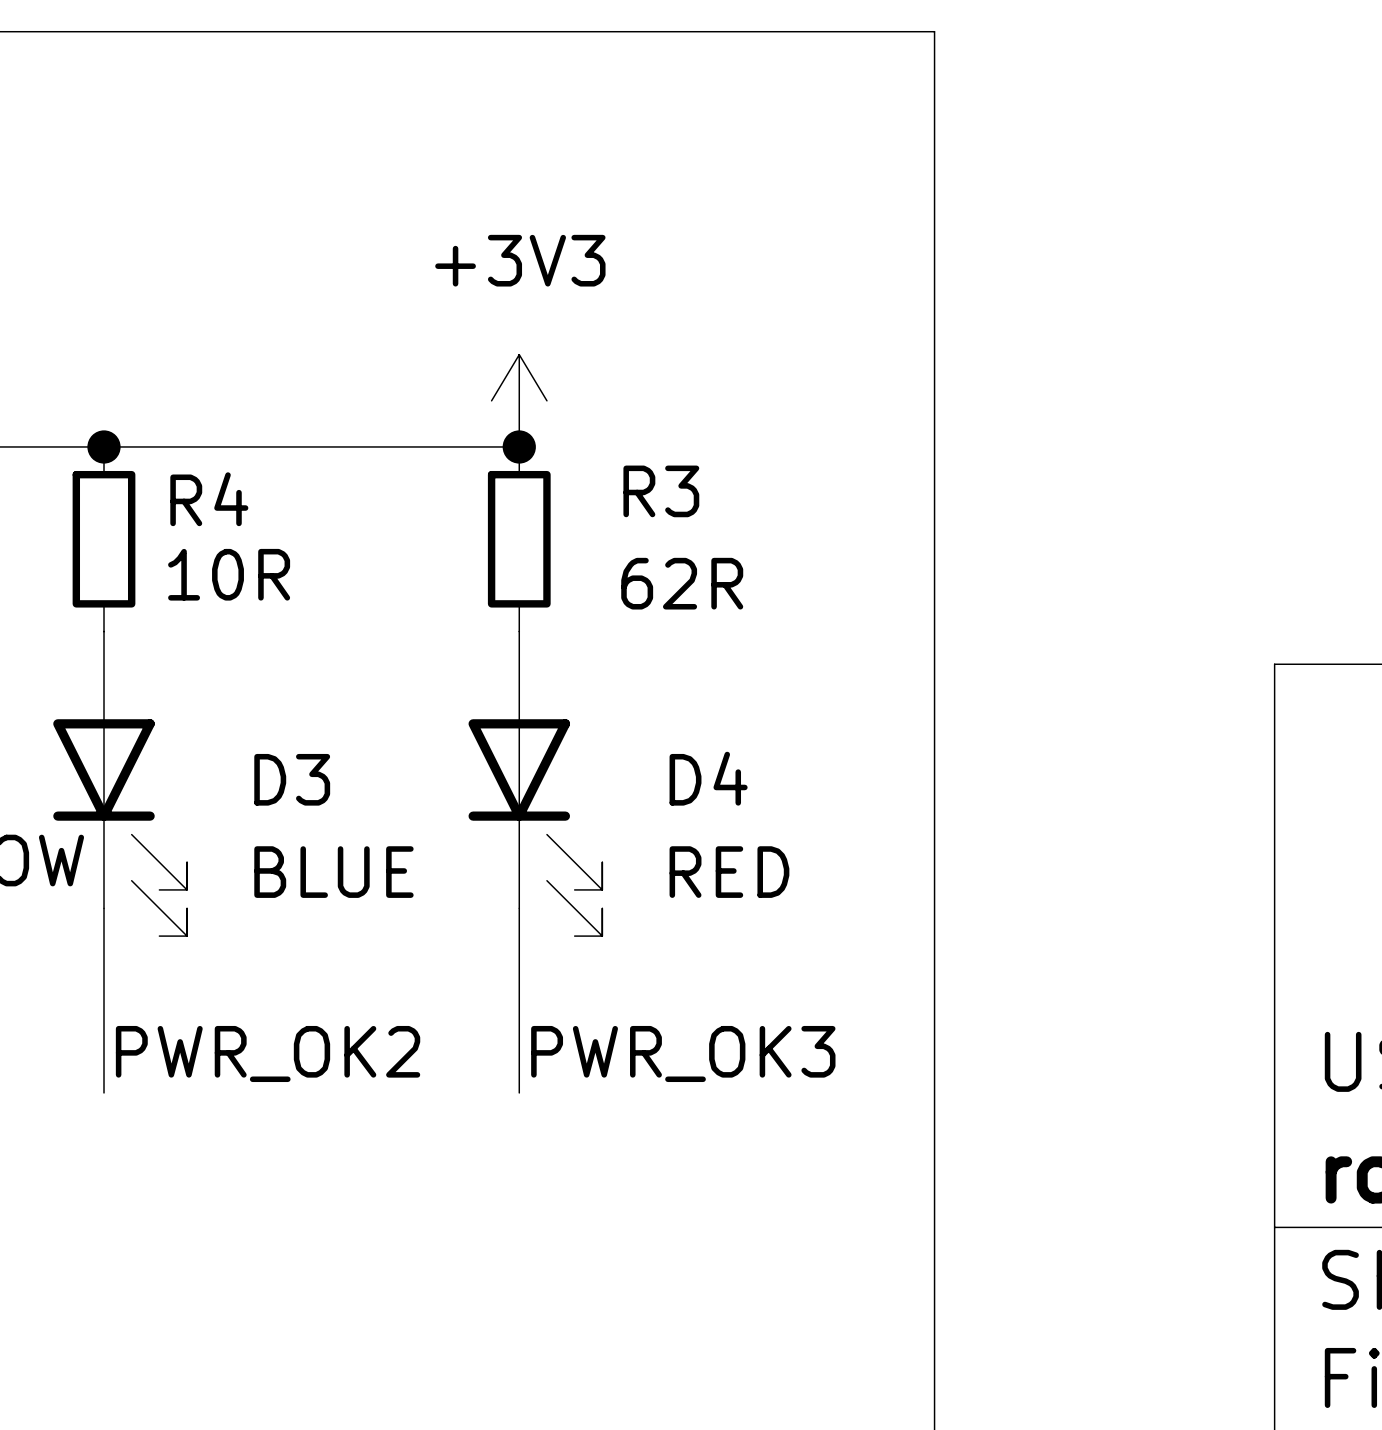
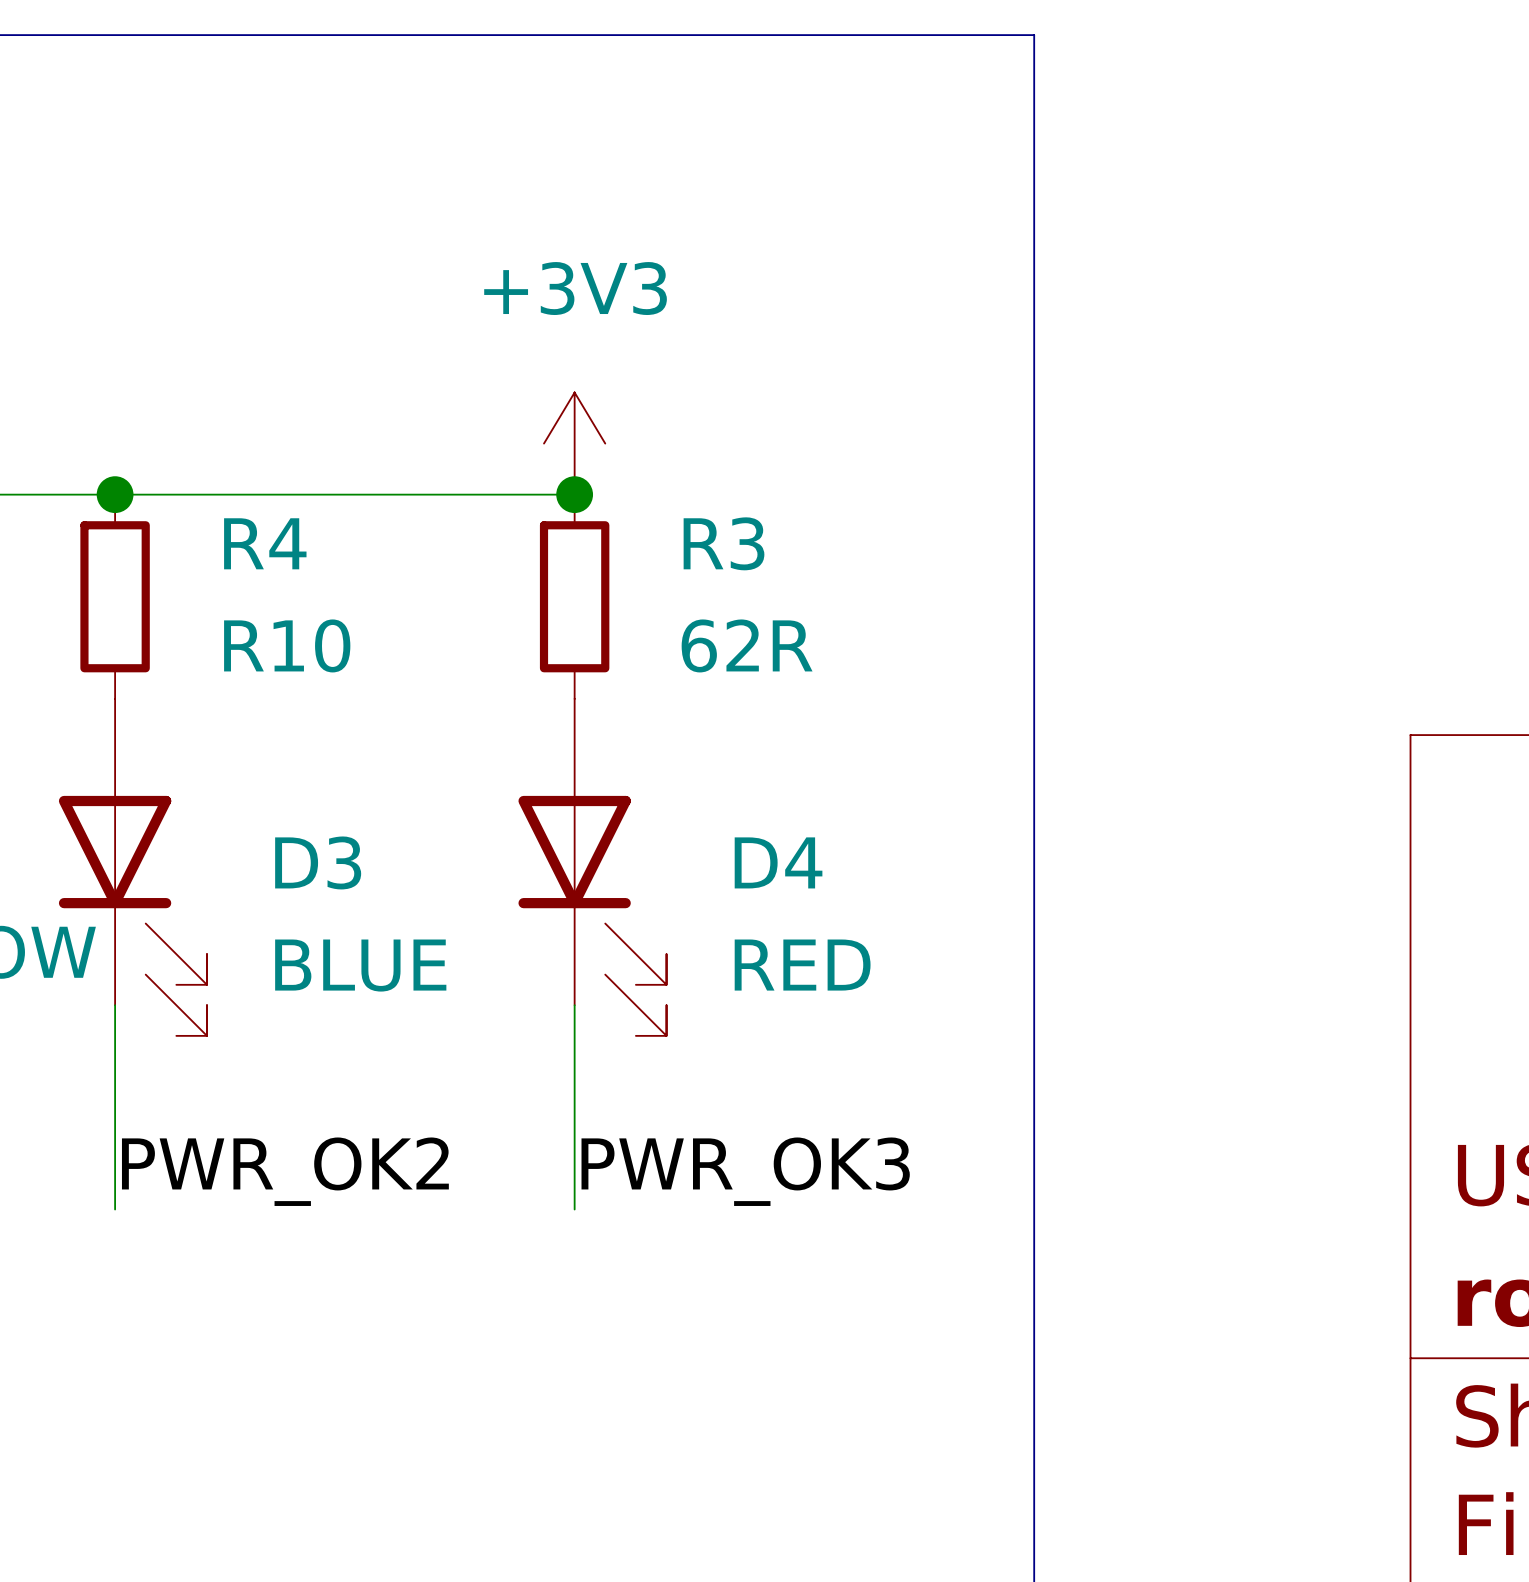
R4 name position: R4 (209, 499) -> R4 (265, 543)
R4 value: 10R (229, 574) -> R10 (287, 645)

